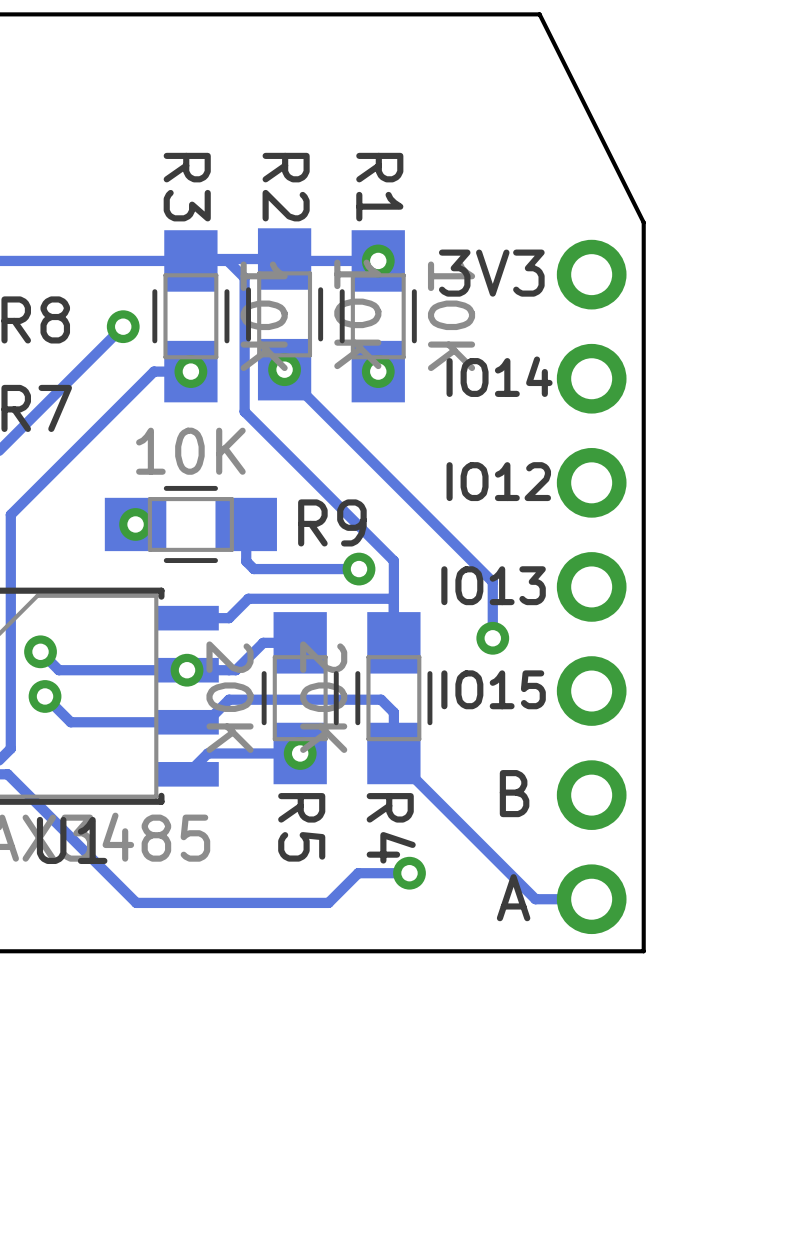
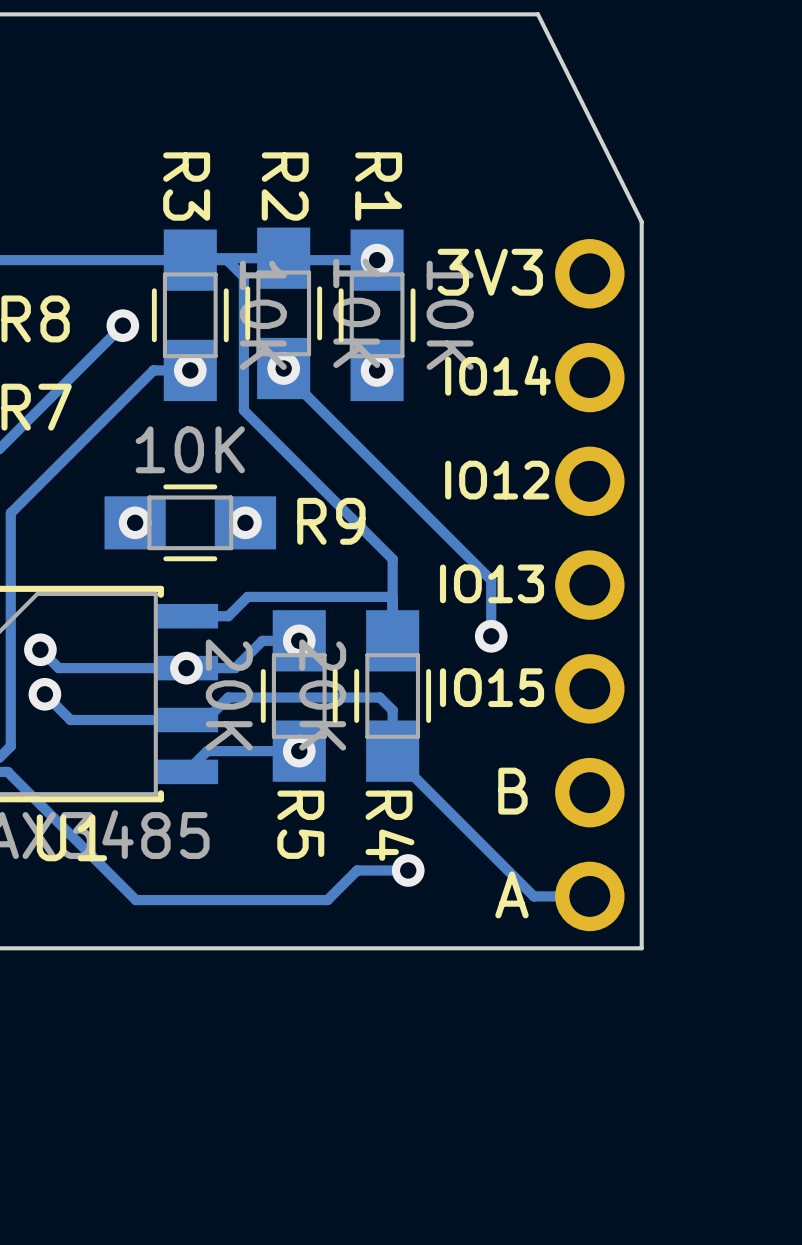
track: (246, 524) (246, 561) (253, 569) (359, 569) -> none
via: none -> (245, 522)
via: (359, 569) -> none
via: none -> (299, 640)

